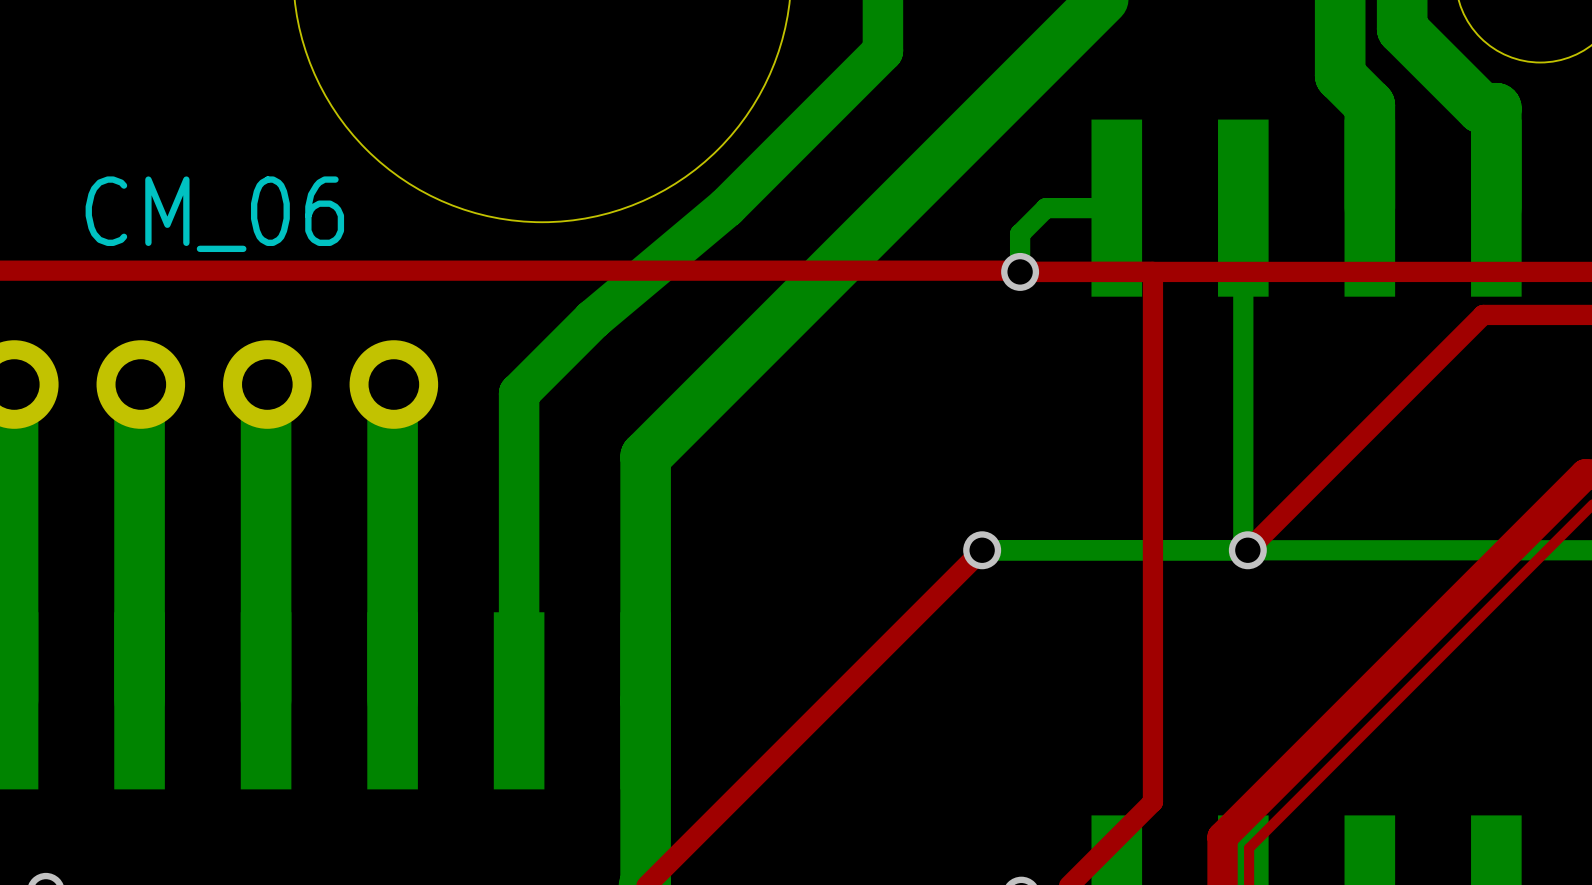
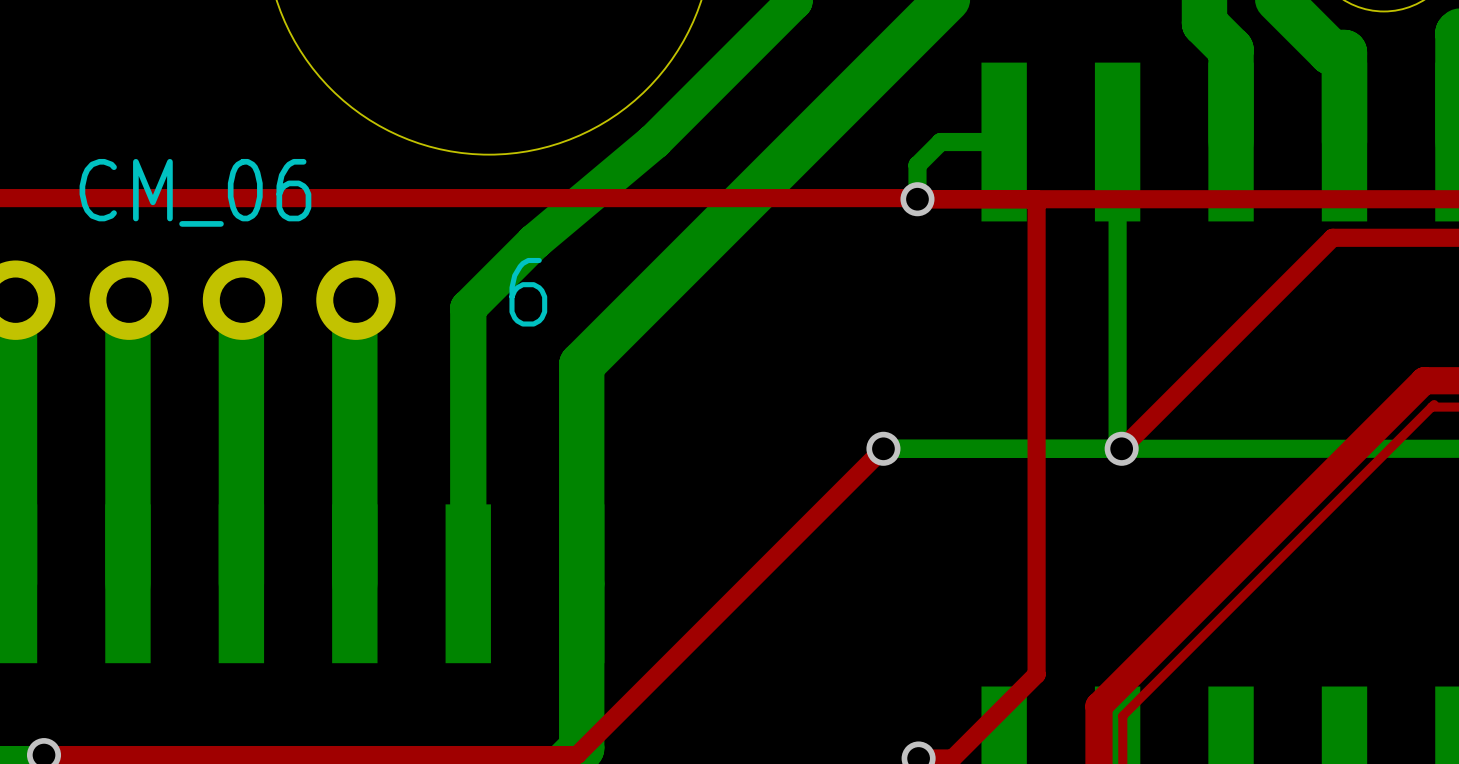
CM_06 name position: CM_06 (214, 214) -> CM_06 (195, 192)
text: none -> 6 (528, 292)

